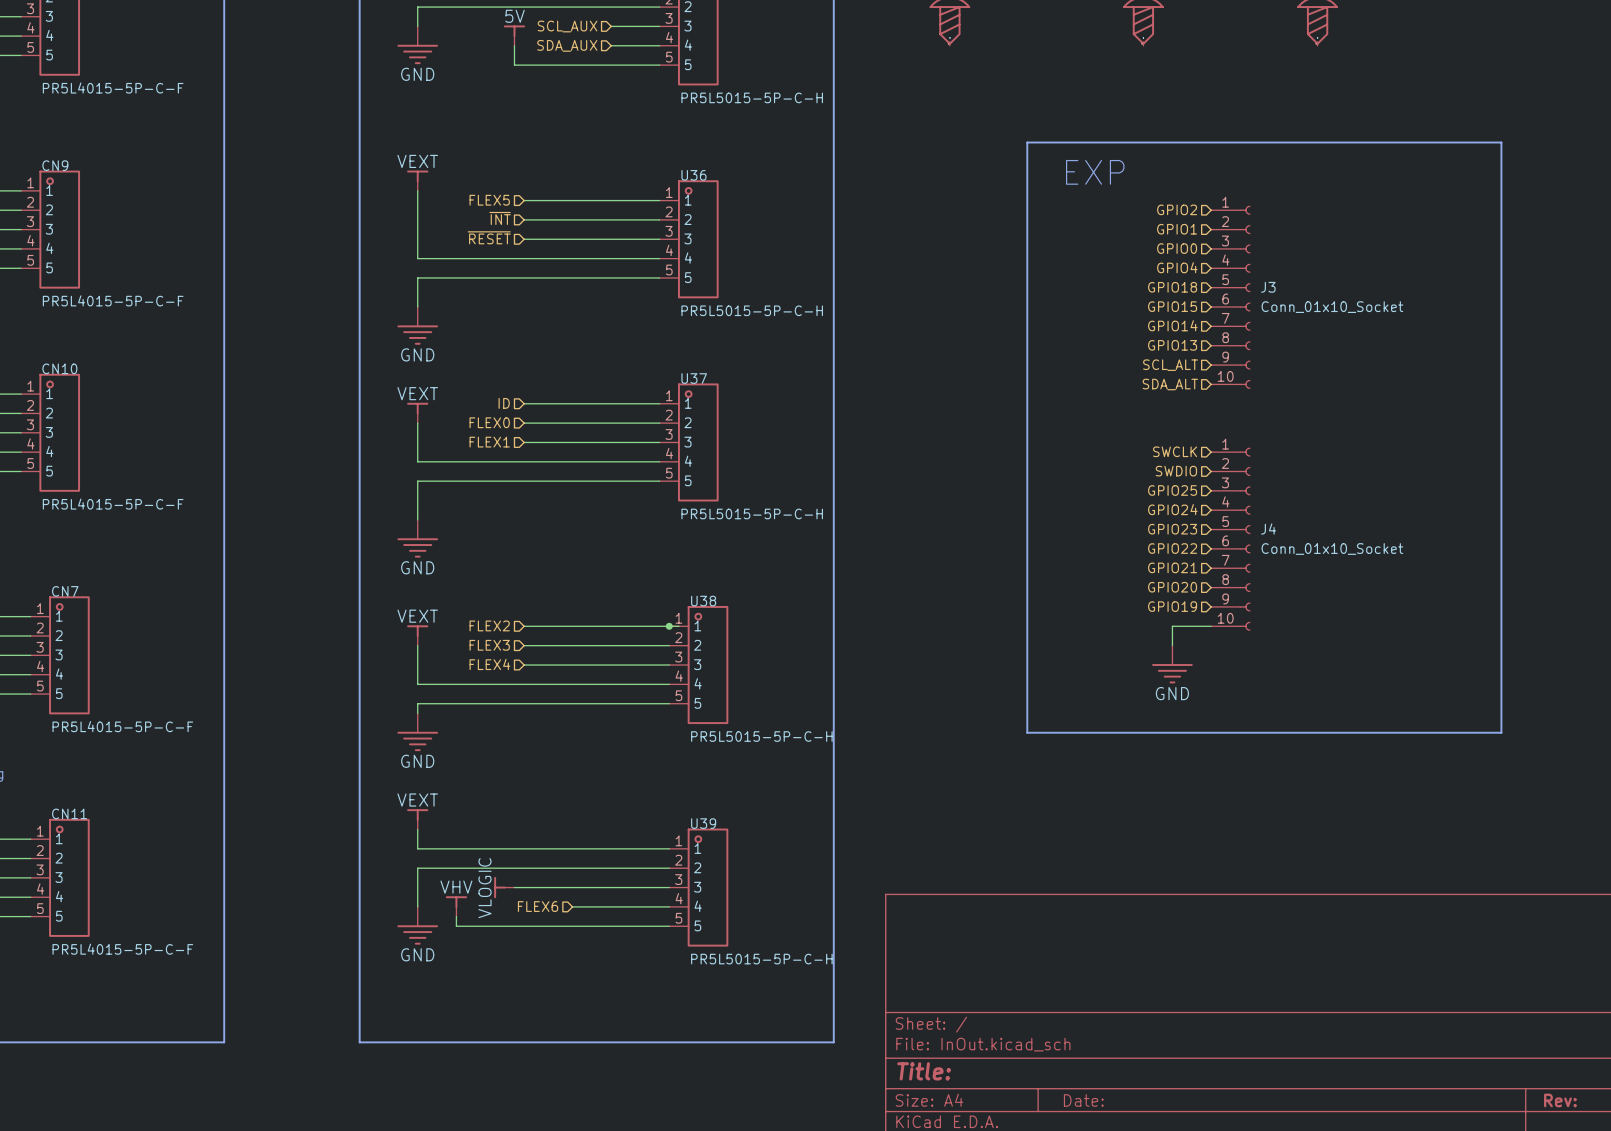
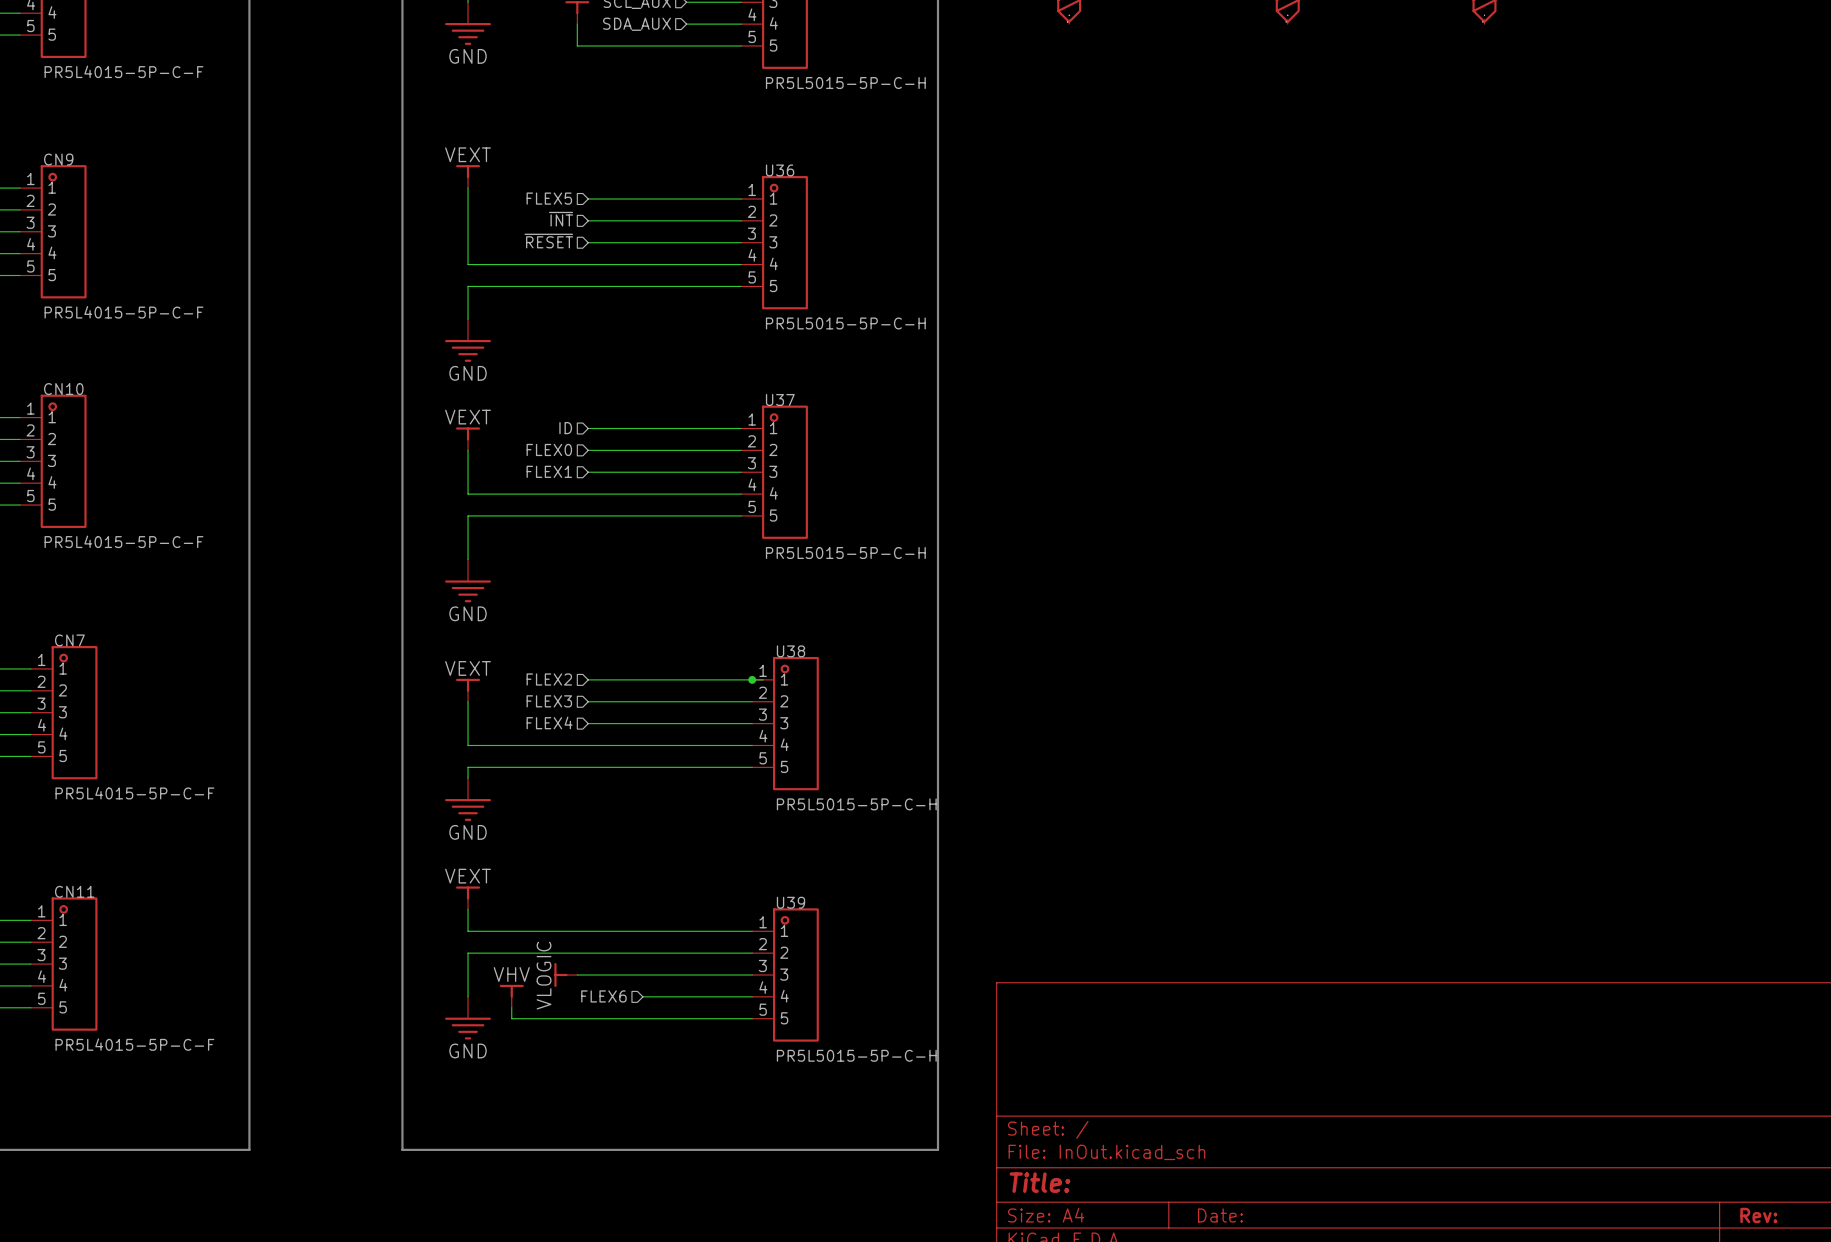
line: (1027, 142) (1501, 142) (1501, 732) (1027, 732) (1027, 142) -> none
text: EXP (1095, 172) -> none
hierarchical label: GPIO2 (1177, 209) -> none
hierarchical label: GPIO1 (1177, 229) -> none
hierarchical label: GPIO0 (1177, 248) -> none
hierarchical label: GPIO4 (1177, 267) -> none
hierarchical label: GPIO18 (1172, 287) -> none
J3: Conn_01x10_Socket (1230, 297) -> none
hierarchical label: GPIO15 (1172, 306) -> none
hierarchical label: GPIO14 (1172, 325) -> none
hierarchical label: GPIO13 (1172, 345) -> none
hierarchical label: SCL_ALT (1170, 365) -> none
hierarchical label: SDA_ALT (1170, 384) -> none
hierarchical label: SWCLK (1175, 451) -> none
hierarchical label: SWDIO (1176, 471) -> none
hierarchical label: GPIO25 (1172, 490) -> none
hierarchical label: GPIO24 (1172, 509) -> none
hierarchical label: GPIO23 (1172, 529) -> none
J4: Conn_01x10_Socket (1230, 539) -> none
hierarchical label: GPIO22 (1172, 548) -> none
hierarchical label: GPIO21 (1172, 567) -> none
hierarchical label: GPIO20 (1172, 587) -> none
hierarchical label: GPIO19 (1172, 606) -> none
wire: (1211, 626) (1172, 626) (1172, 645) -> none
power symbol: GND (1172, 664) -> none

